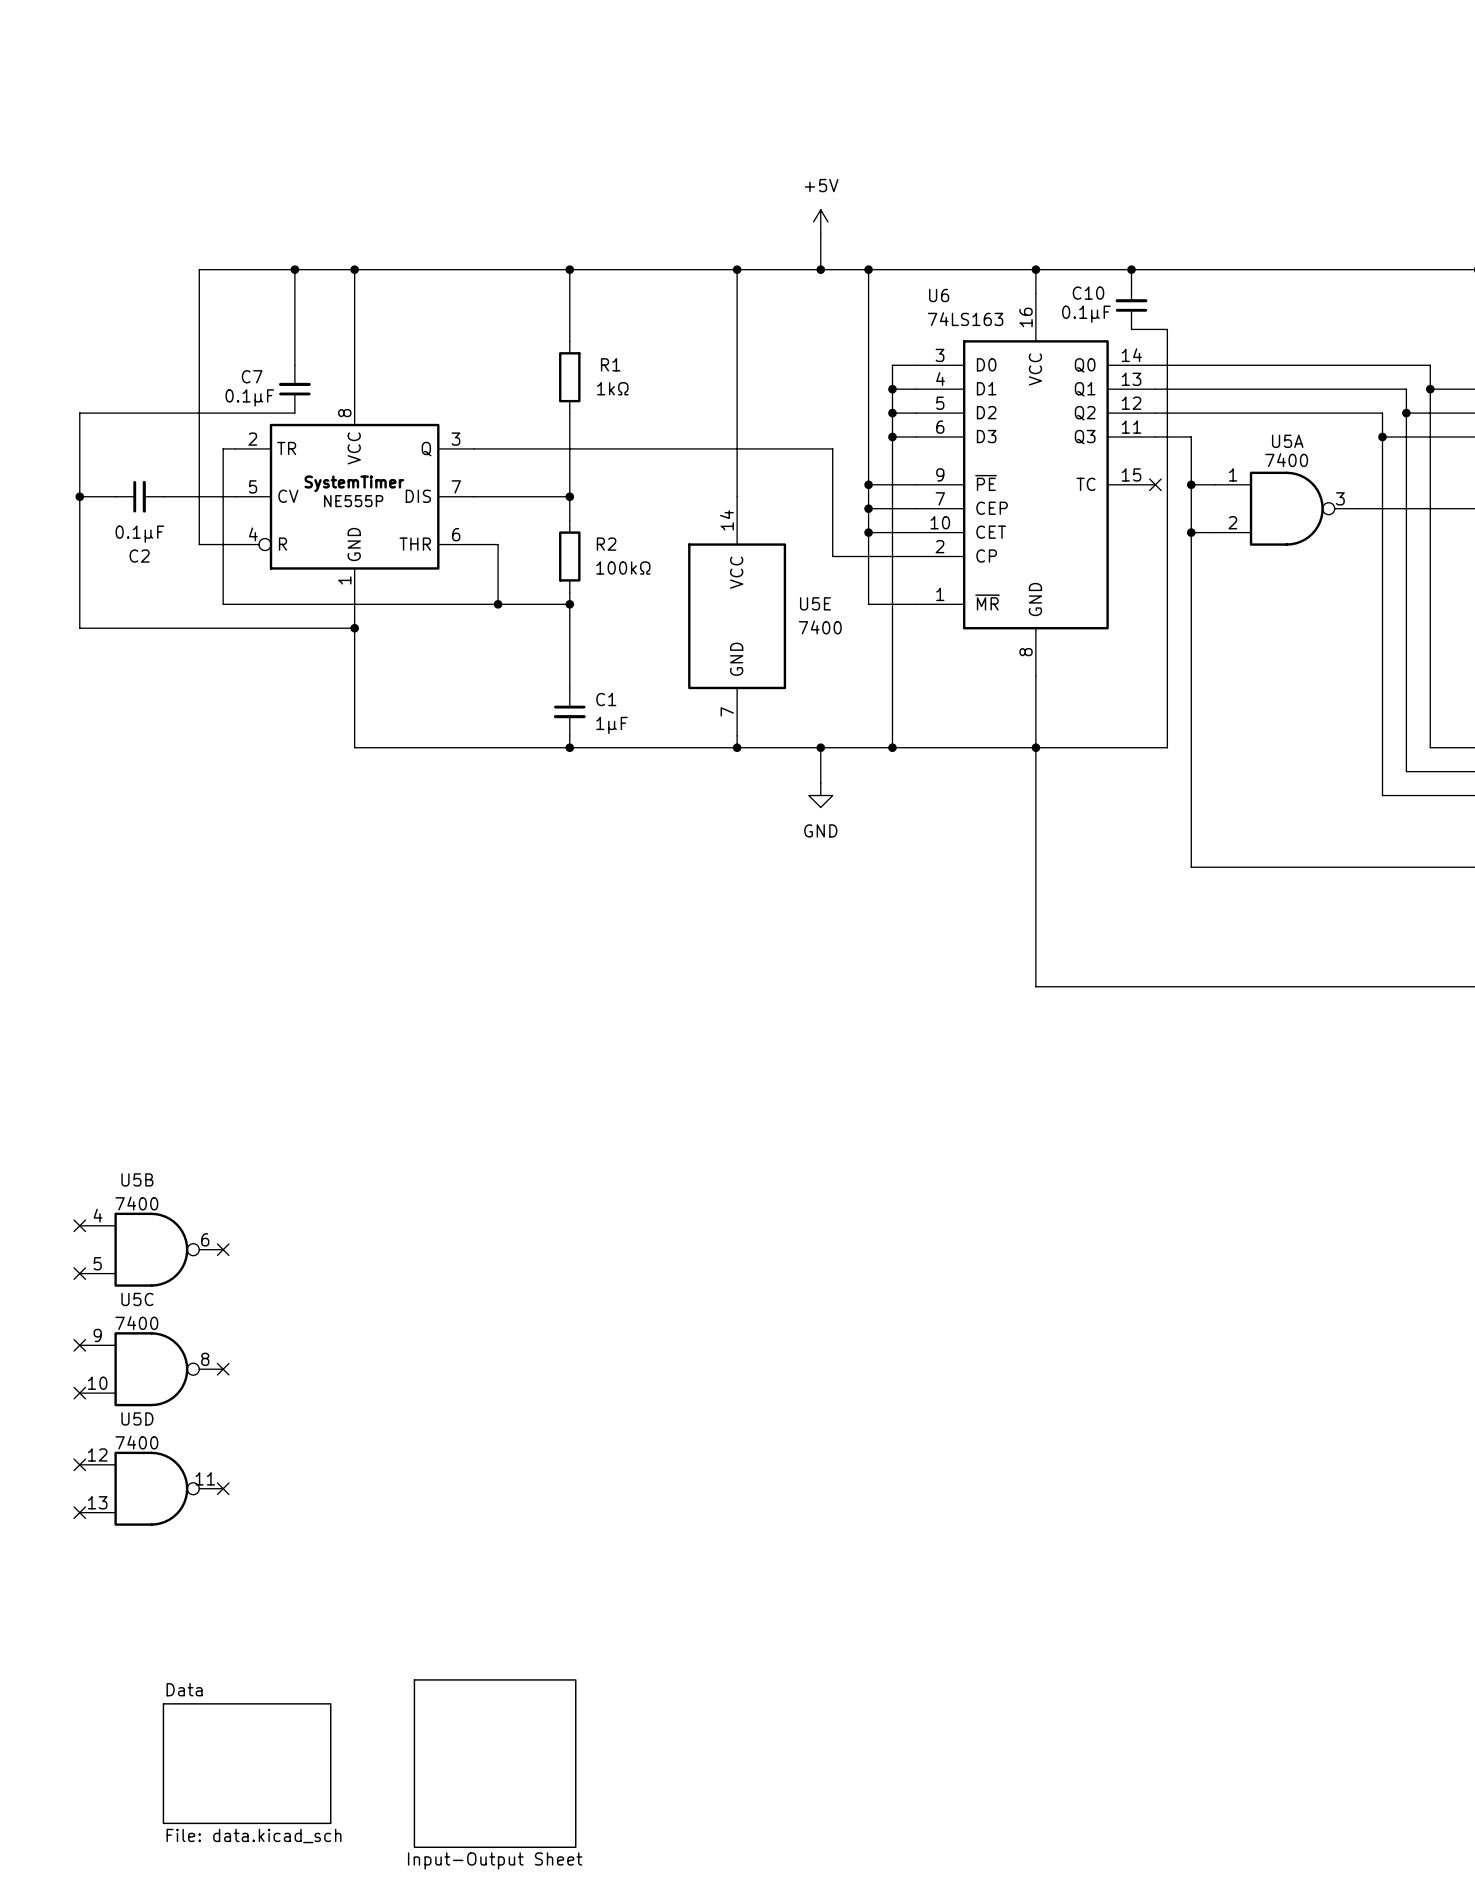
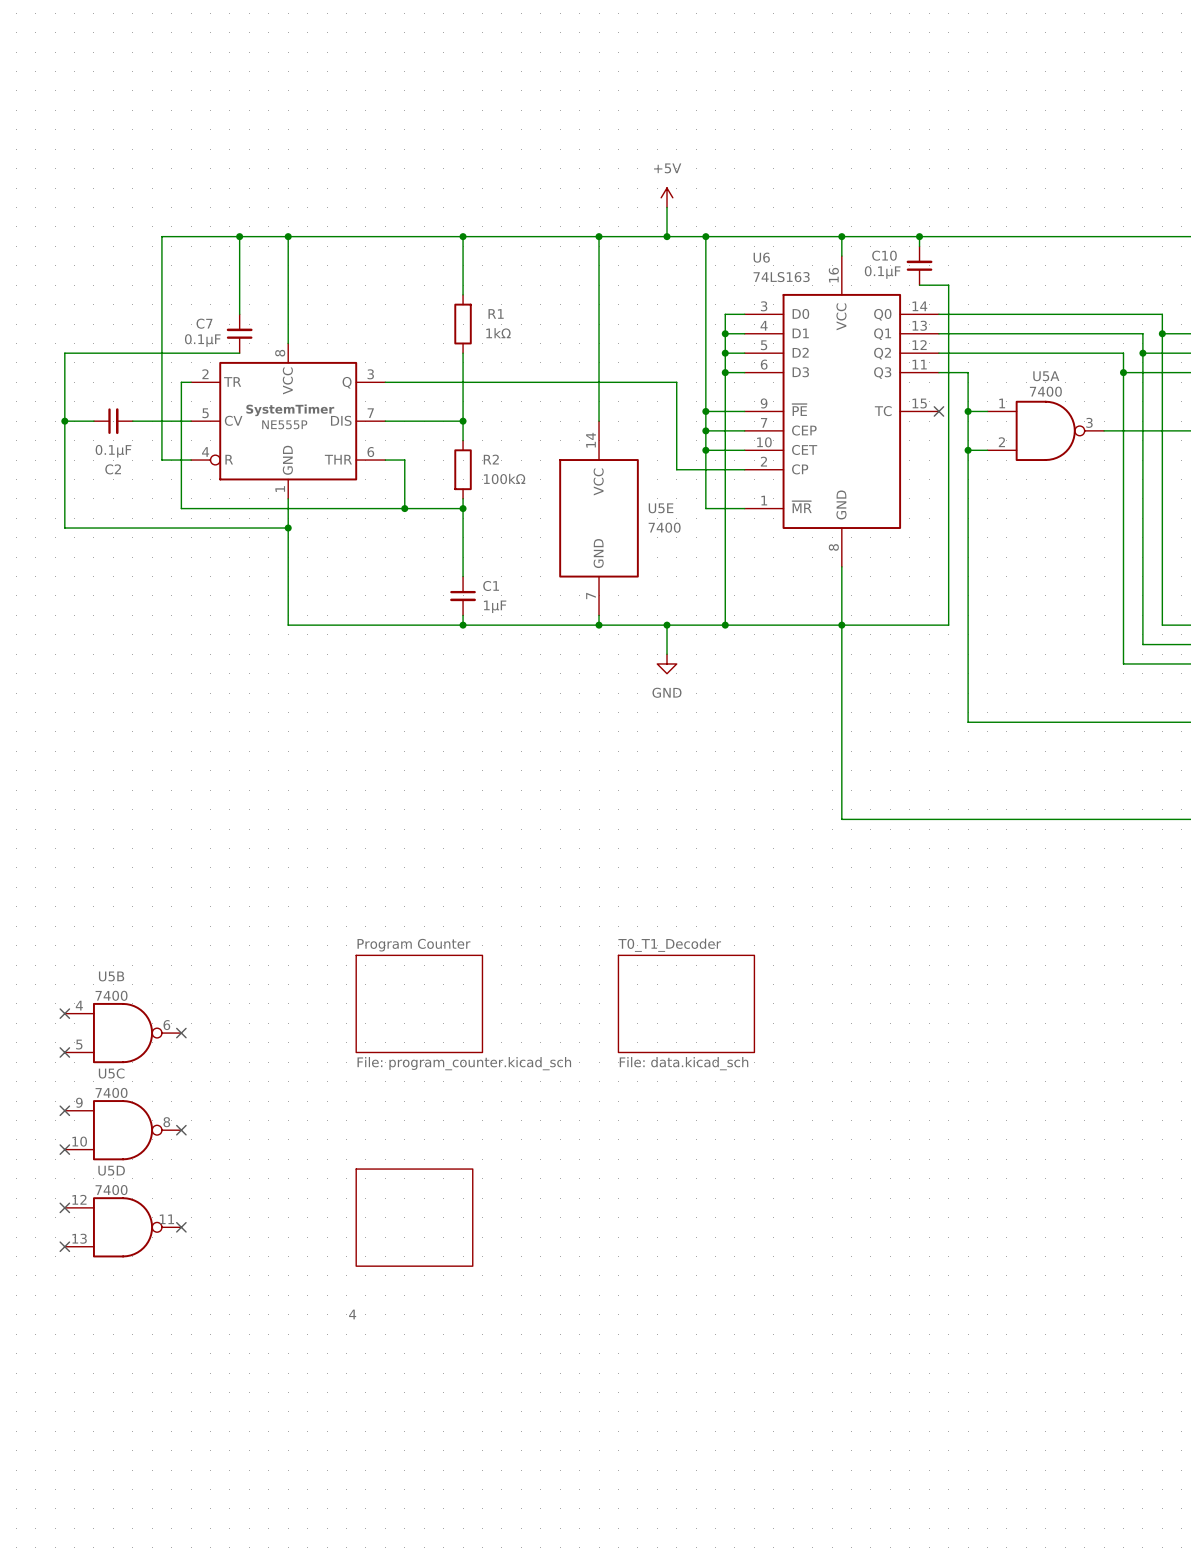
sheet Program Counter: none -> File: program_counter.kicad_sch (419, 1003)
sheet T0_T1_Decoder: none -> File: data.kicad_sch (686, 1003)
sheet 4: none -> (414, 1217)
sheet Data: File: data.kicad_sch (247, 1763) -> none
sheet Input-Output Sheet: (495, 1763) -> none

